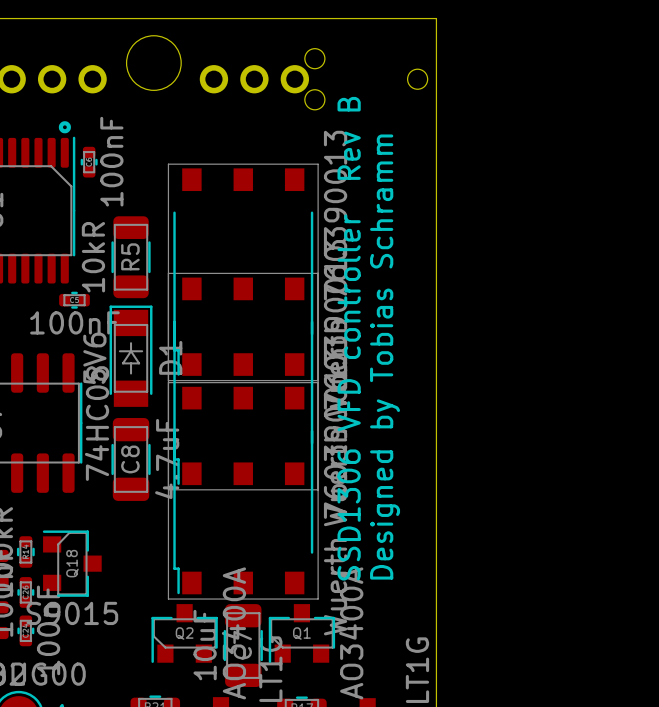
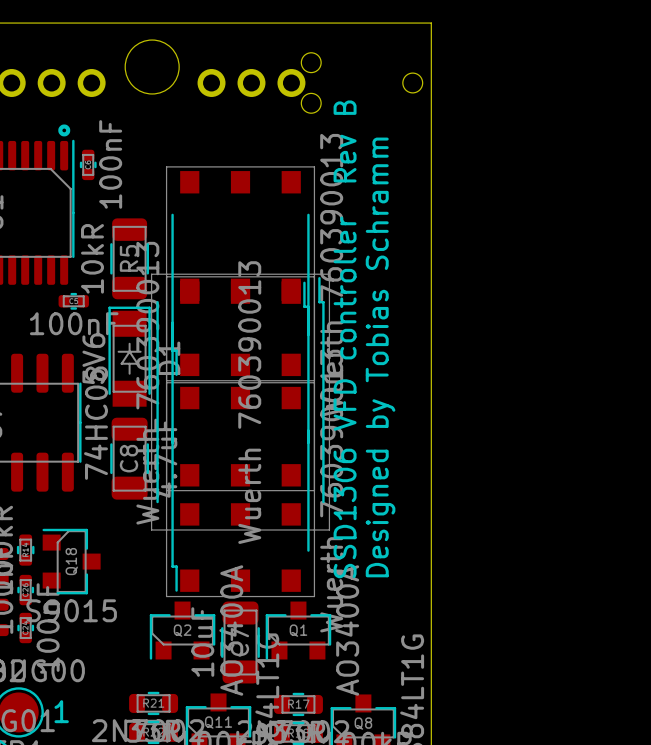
part rotation: 0° (243, 381) -> 180° (240, 383)
part: none -> Wuerth 760390013 (240, 402)

